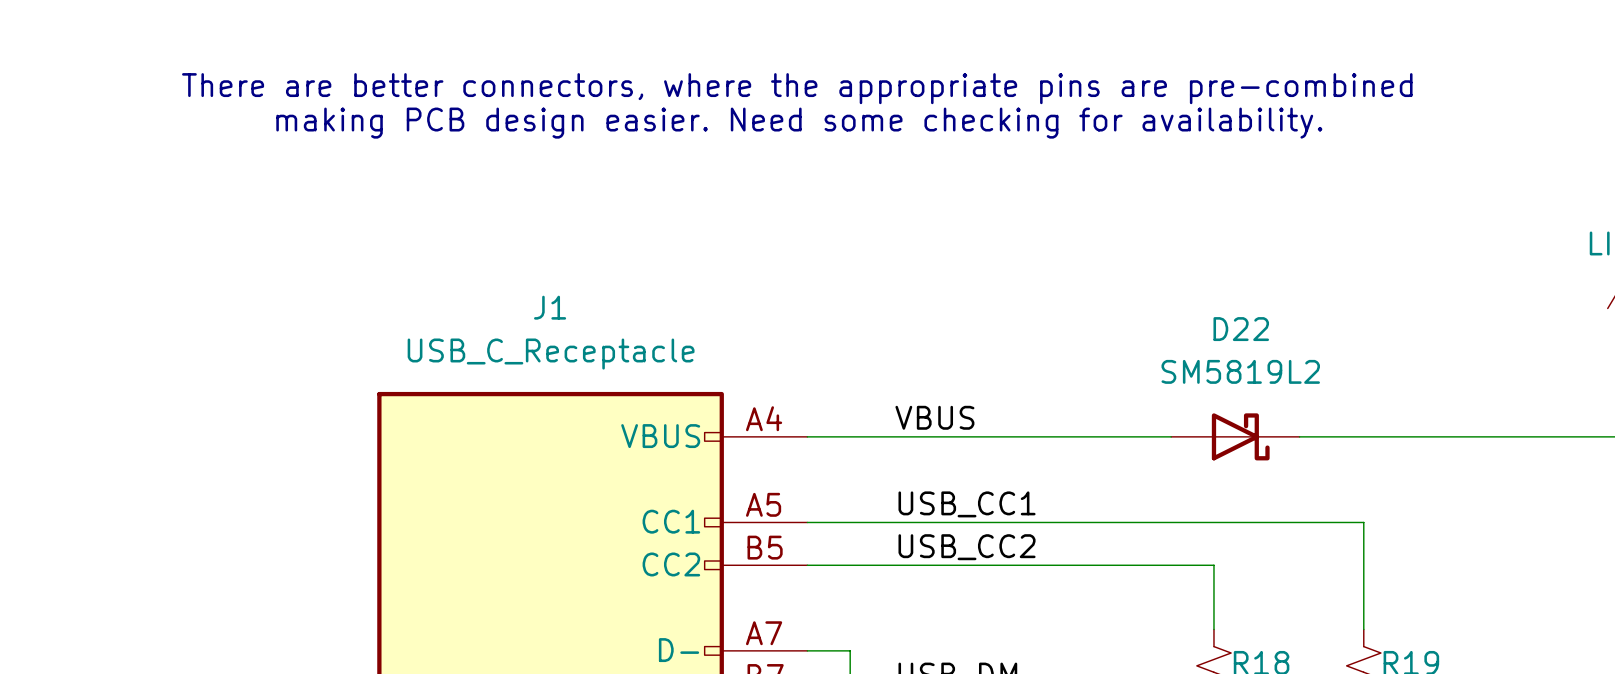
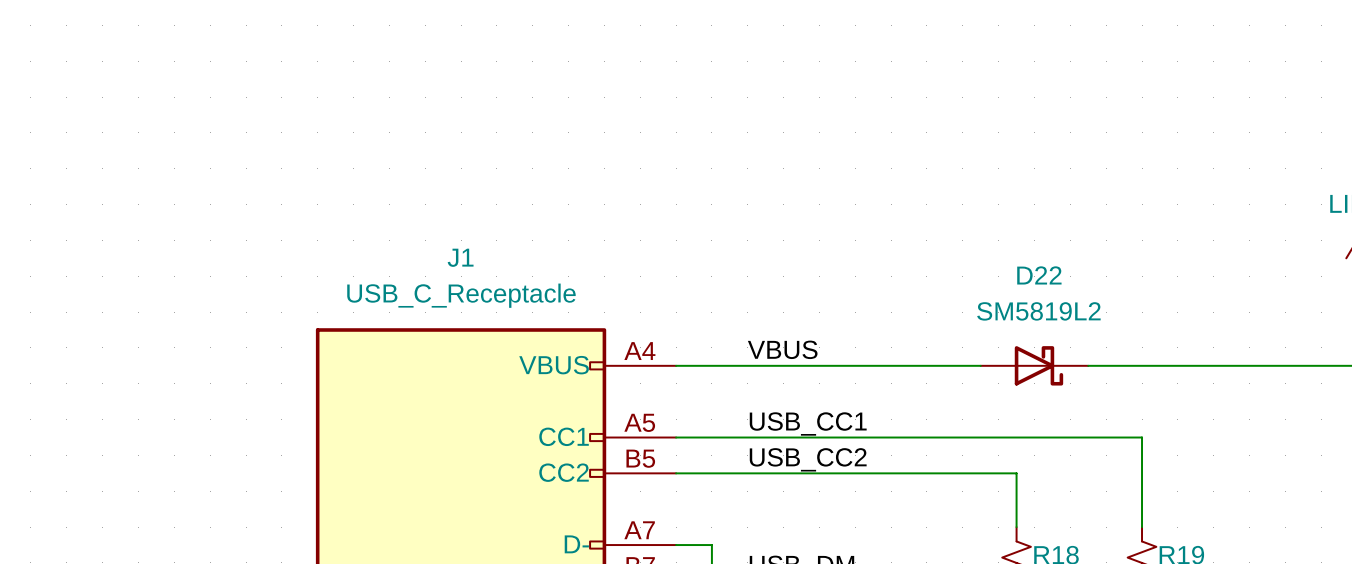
text: There are better connectors, where the appropriate pins are pre-combined (797, 88) -> none
text: making PCB design easier. Need some checking for availability. (799, 123) -> none

